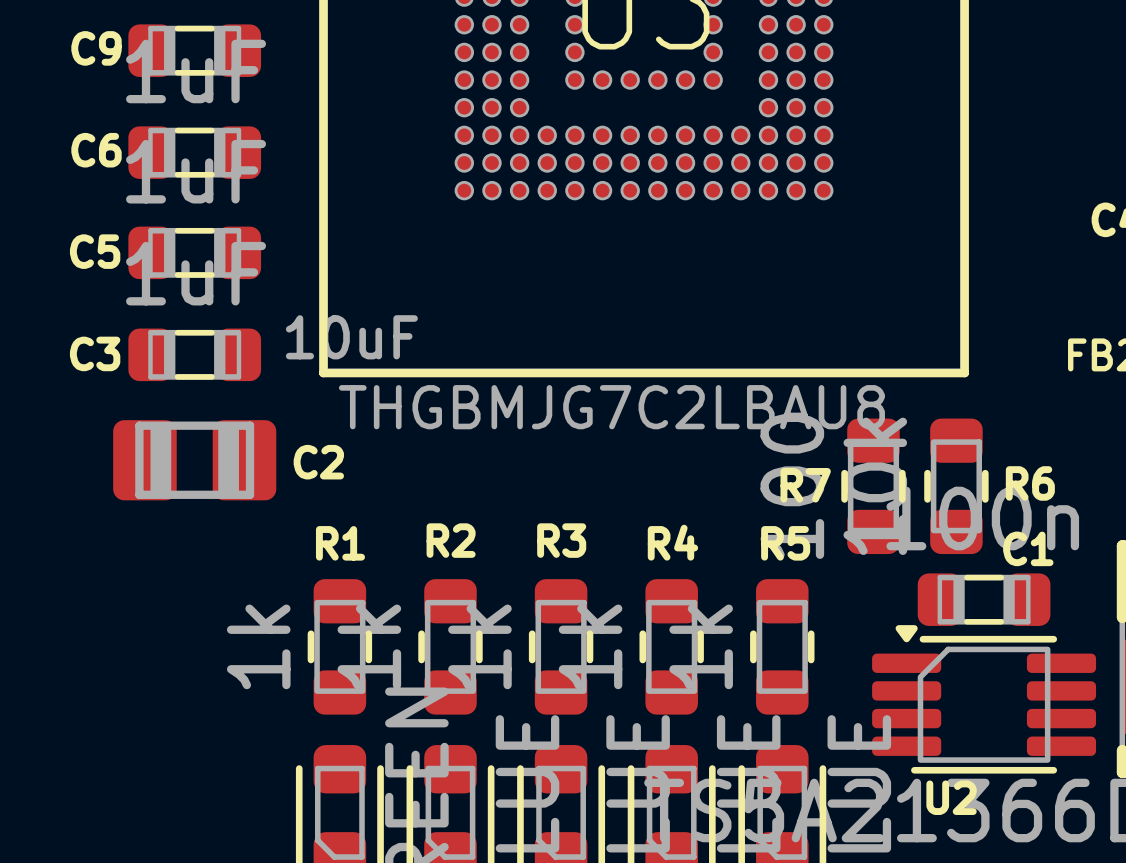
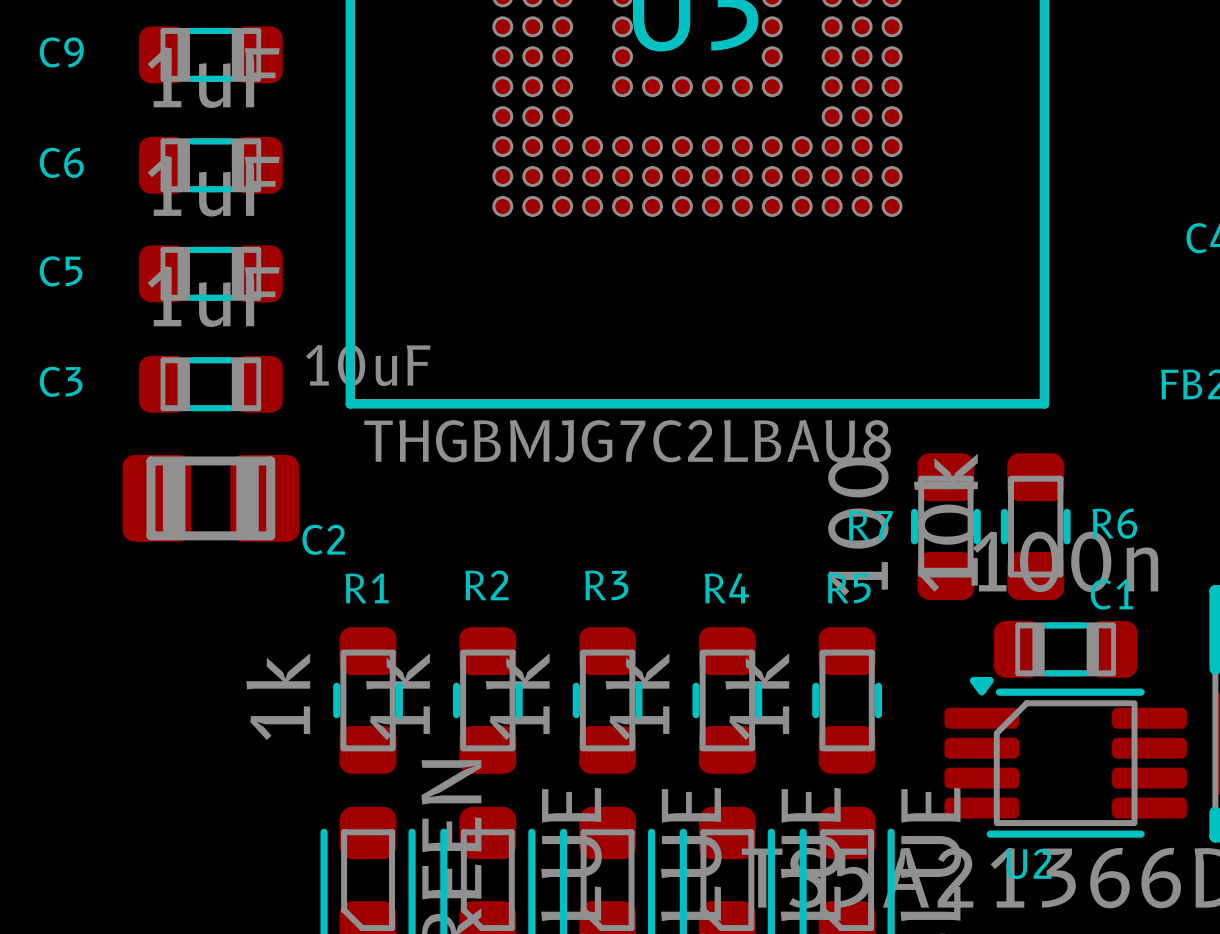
C9 name position: C9 (96, 48) -> C9 (61, 52)
C6 name position: C6 (96, 150) -> C6 (61, 162)
C5 name position: C5 (95, 251) -> C5 (61, 271)
C3 name position: C3 (95, 353) -> C3 (61, 381)
C2 name position: C2 (318, 462) -> C2 (323, 539)

